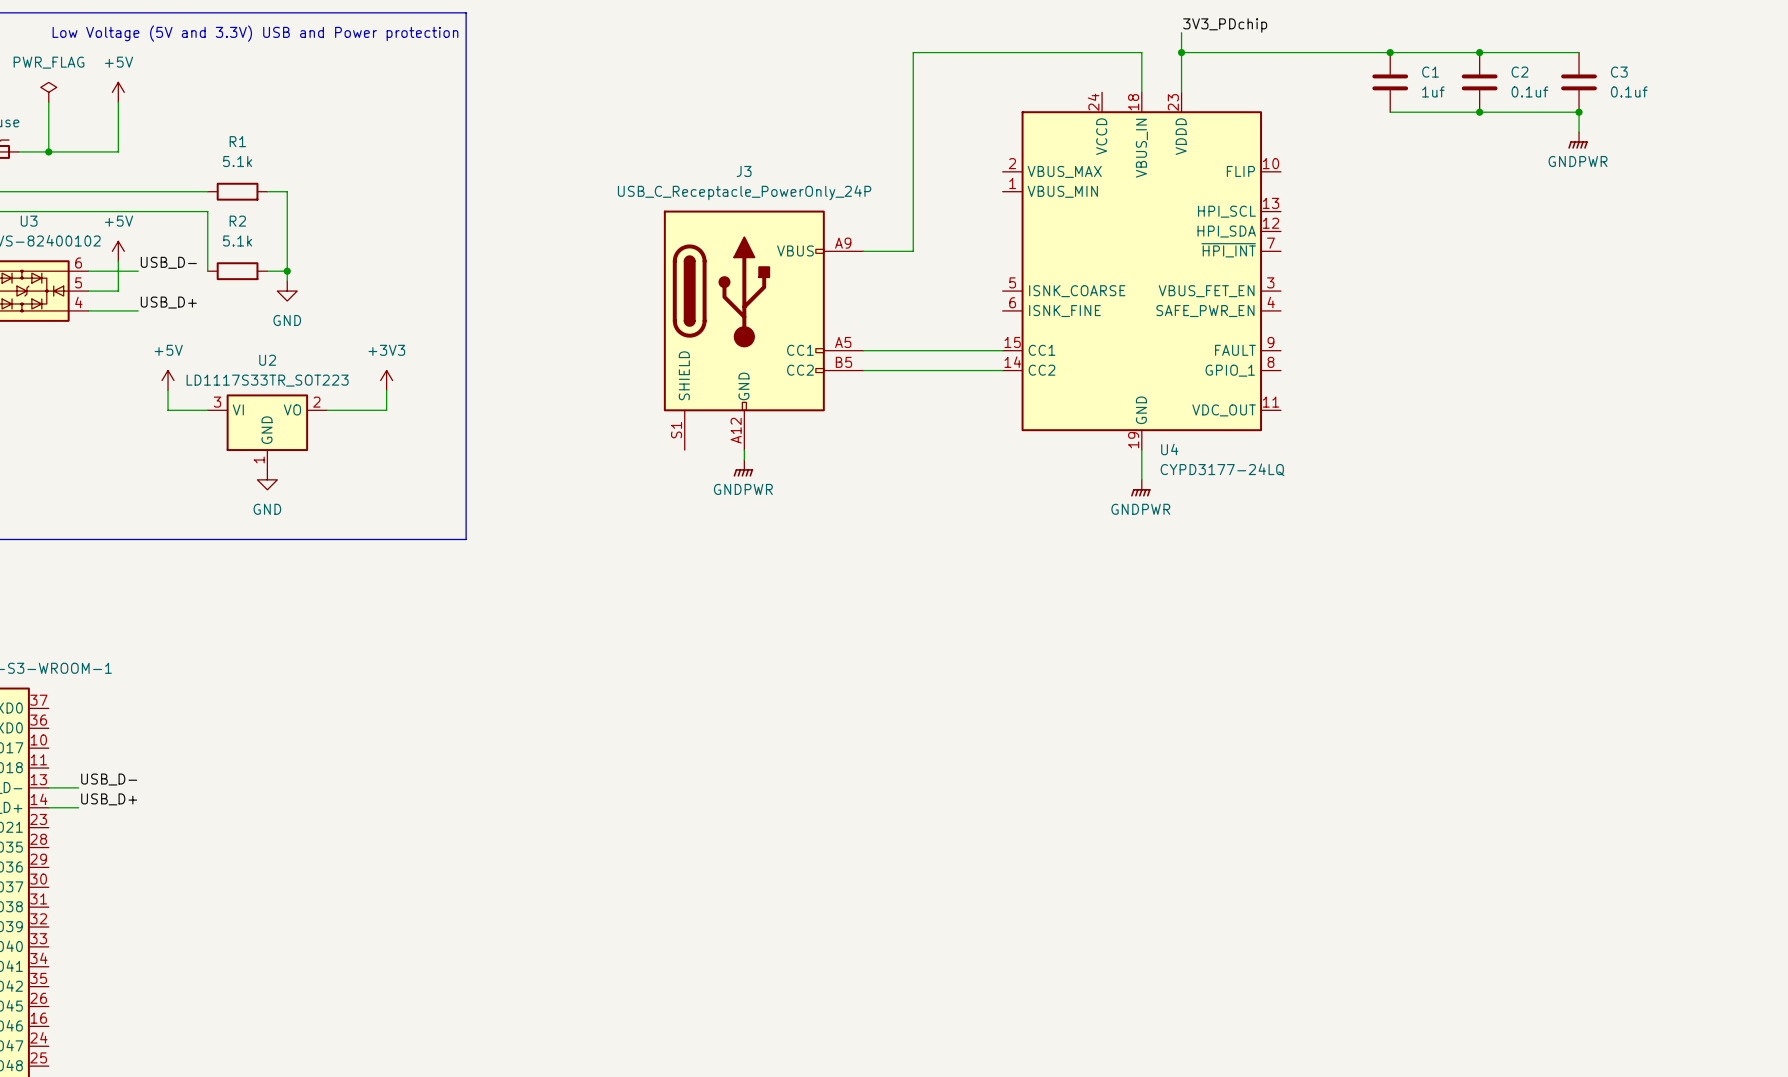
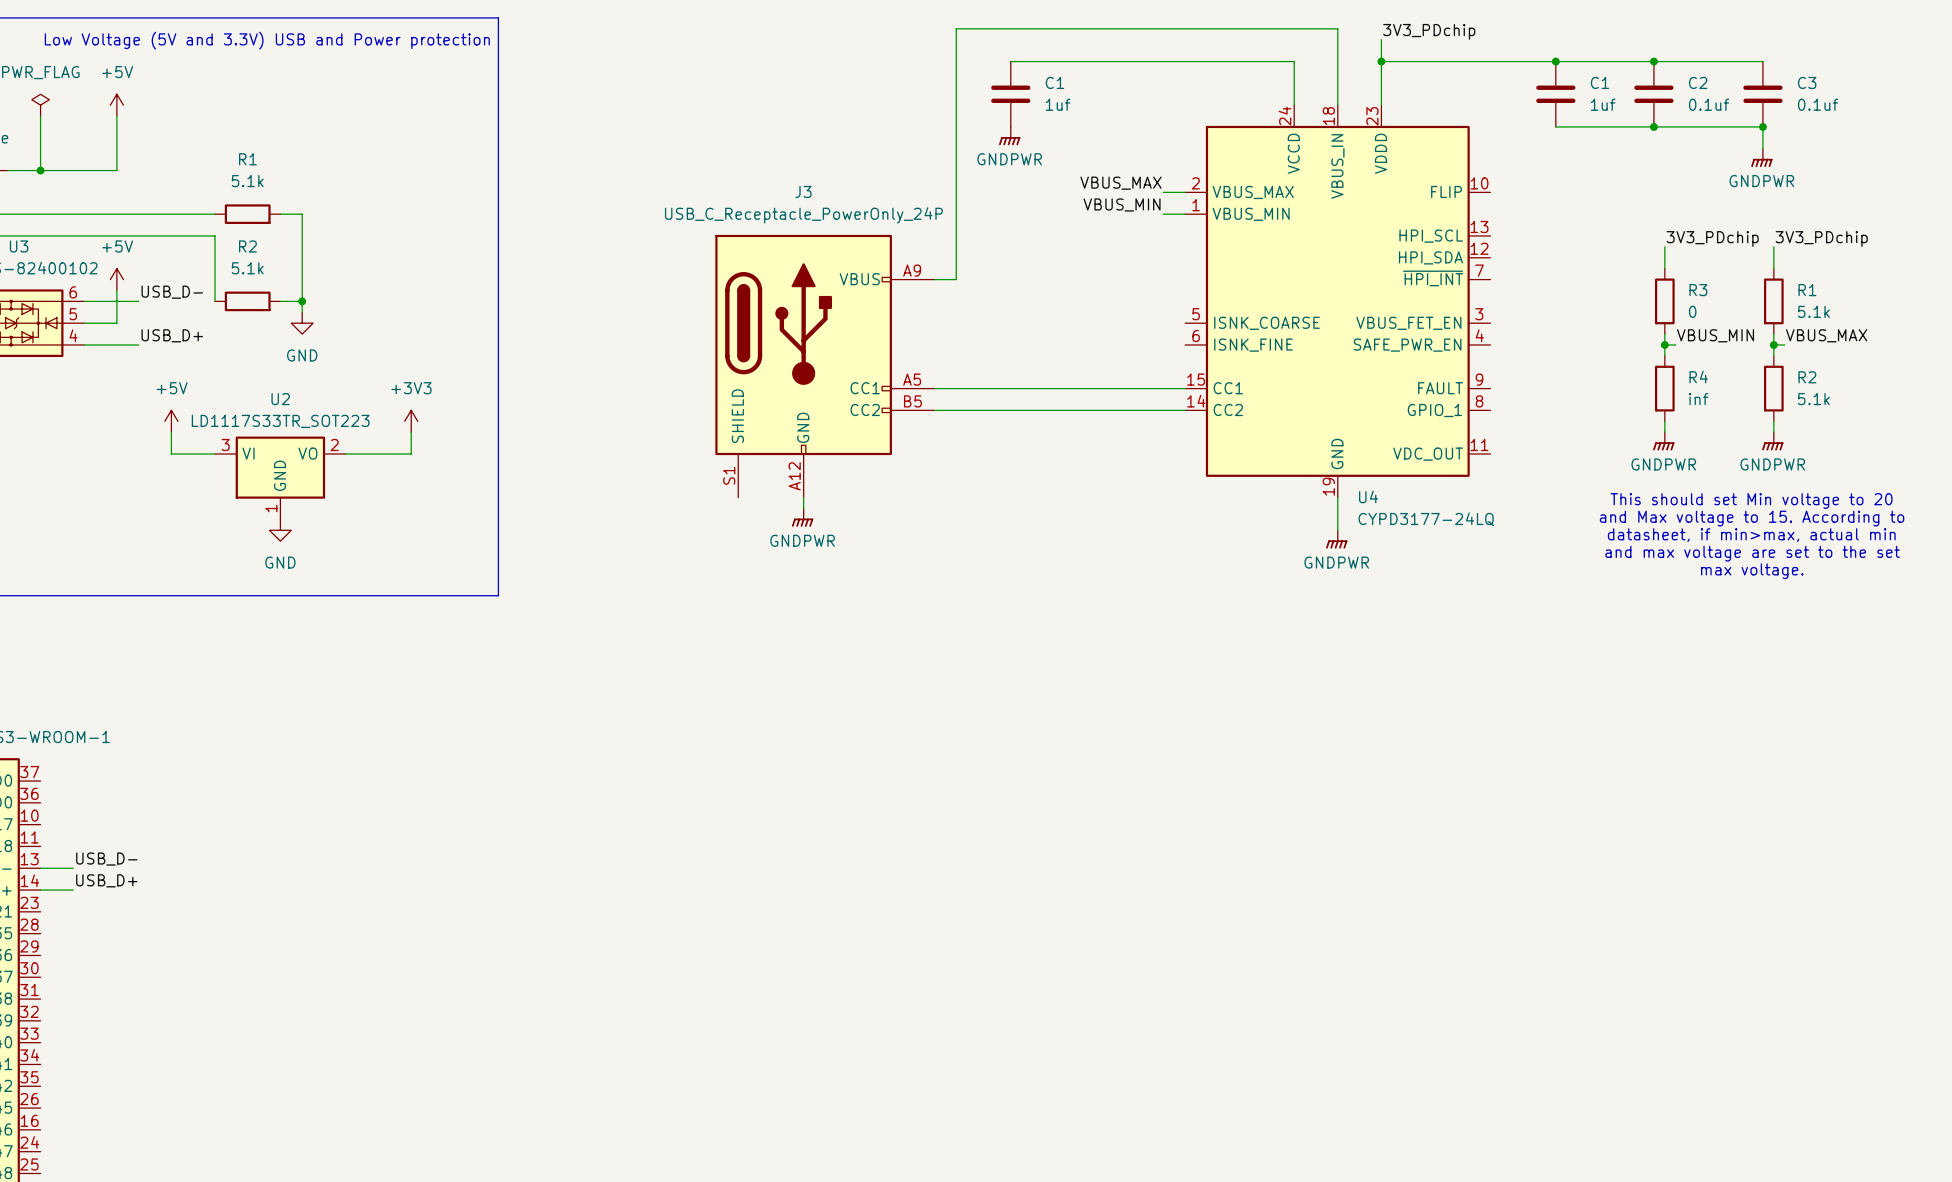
label position: 3V3_PDchip (1225, 25) -> 3V3_PDchip (1429, 31)
wire: (1181, 32) (1181, 92) -> (1381, 39) (1381, 105)
wire: (933, 52) (913, 52) (913, 251) (883, 251) -> (1337, 105) (1337, 28) (956, 28) (956, 279)
wire: (1141, 52) (1141, 92) -> (1239, 61) (1283, 61)
junction: (1181, 52) -> none
wire: (1191, 52) (1270, 52) -> (1294, 61) (1294, 105)
junction: none -> (1381, 61)
junction: (1390, 52) -> none
junction: none -> (1555, 61)
junction: (1479, 52) -> none
junction: none -> (1653, 61)
wire: none -> (1719, 61) (1762, 61)
C1: none -> 1uf (1010, 94)
C1 position: (1390, 82) -> (1555, 94)
C2 position: (1479, 82) -> (1653, 94)
C3 position: (1579, 82) -> (1762, 94)
wire: (1390, 112) (1429, 112) -> none
junction: (1479, 112) -> none
junction: none -> (1653, 126)
wire: (1579, 112) (1579, 132) -> (1719, 126) (1762, 126) (1762, 148)
junction: (1579, 112) -> none
junction: none -> (1762, 126)
power symbol: none -> GNDPWR (1009, 136)
power symbol position: GNDPWR (1578, 140) -> GNDPWR (1761, 157)
label: none -> VBUS_MAX (1120, 183)
label: none -> VBUS_MIN (1122, 204)
label: none -> 3V3_PDchip (1712, 238)
label: none -> 3V3_PDchip (1821, 238)
wire: none -> (1664, 246) (1664, 268)
wire: none -> (1773, 246) (1773, 268)
U4 position: (1141, 271) -> (1337, 301)
R3: none -> 0 (1664, 301)
R1: none -> 5.1k (1773, 301)
wire: none -> (1664, 334) (1664, 355)
wire: none -> (1773, 334) (1773, 355)
label: none -> VBUS_MIN (1715, 335)
label: none -> VBUS_MAX (1826, 335)
wire: none -> (1664, 344) (1675, 344)
junction: none -> (1664, 344)
wire: none -> (1773, 344) (1784, 344)
junction: none -> (1773, 344)
R4: none -> inf (1664, 388)
R2: none -> 5.1k (1773, 388)
wire: none -> (1664, 421) (1664, 432)
wire: none -> (1773, 421) (1773, 432)
power symbol: none -> GNDPWR (1663, 441)
power symbol: none -> GNDPWR (1772, 441)
wire: (1141, 450) (1141, 479) -> (1337, 497) (1337, 530)
text: none -> This should set Min voltage to 20 (1751, 501)
text: none -> and Max voltage to 15. According to (1752, 518)
text: none -> datasheet, if min>max, actual min (1751, 535)
power symbol position: GNDPWR (1140, 488) -> GNDPWR (1336, 539)
text: none -> and max voltage are set to the set (1752, 553)
text: none -> max voltage. (1752, 571)

